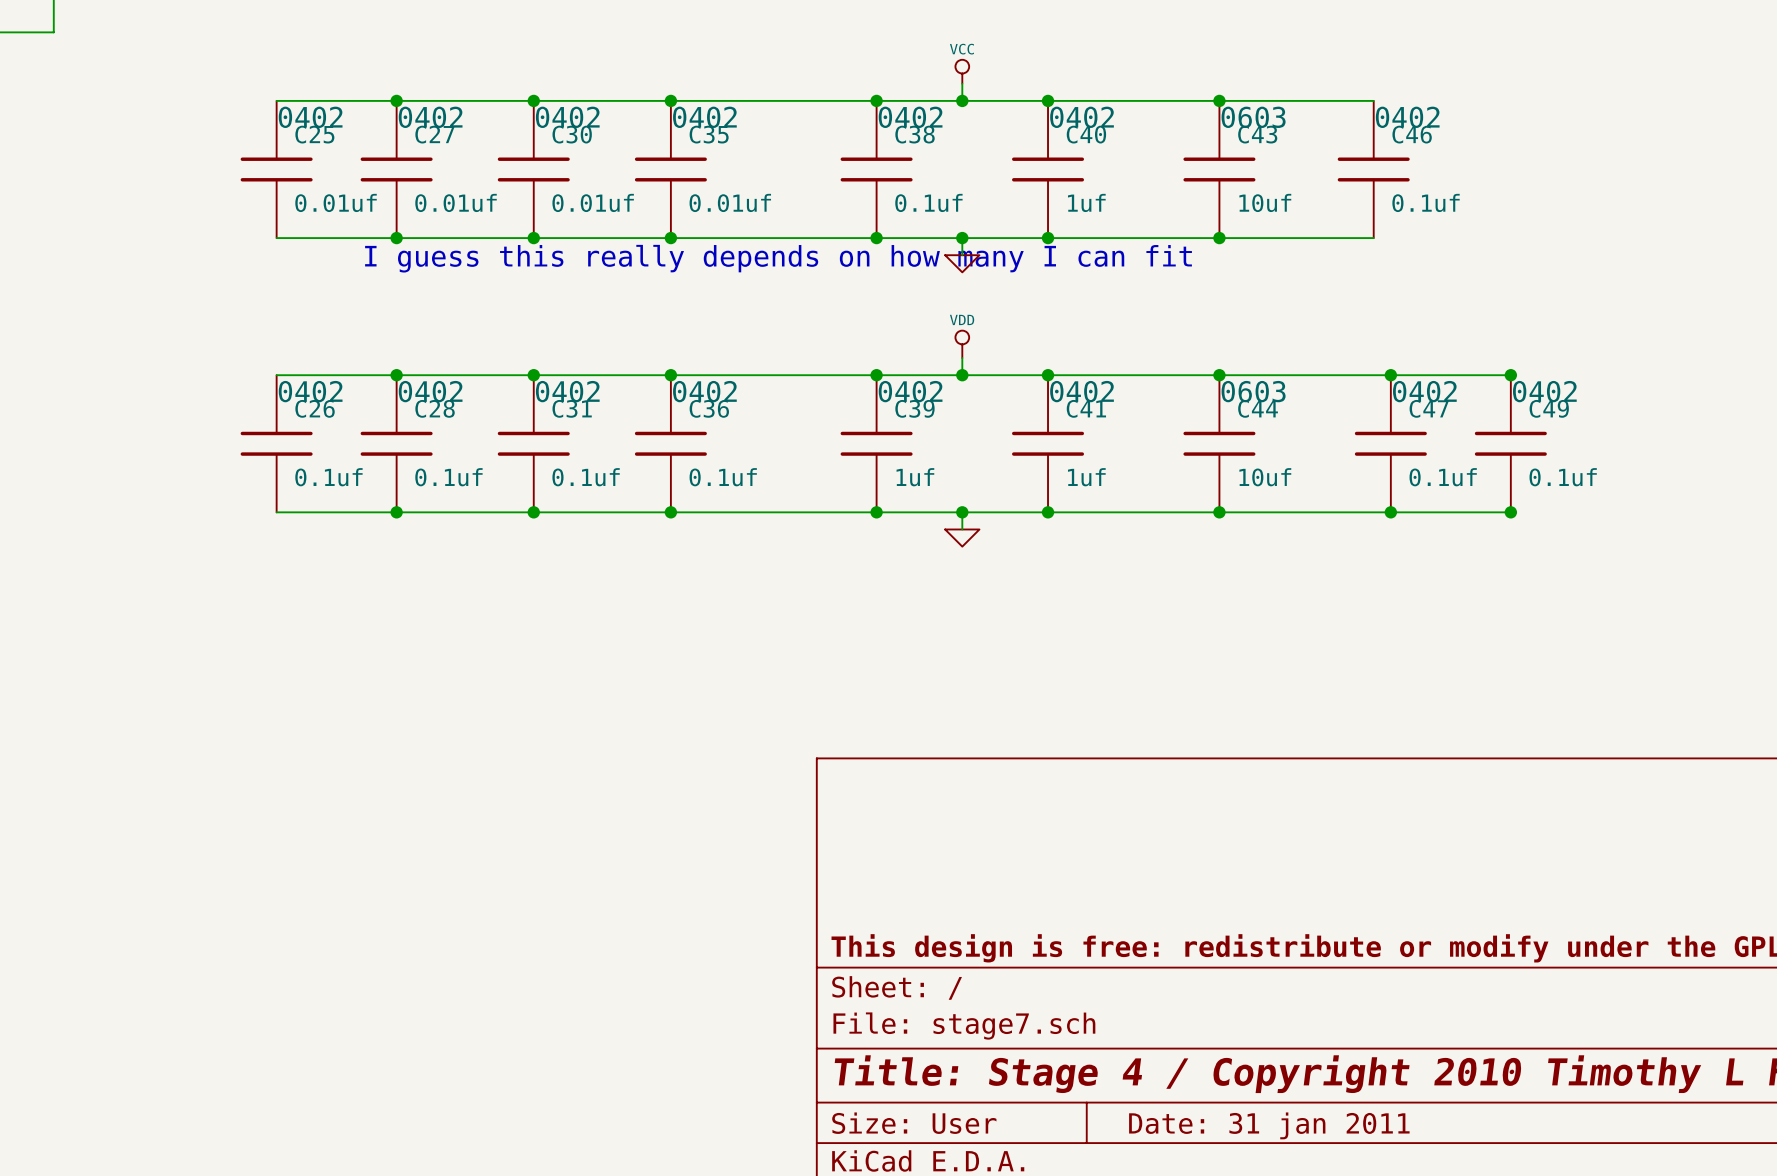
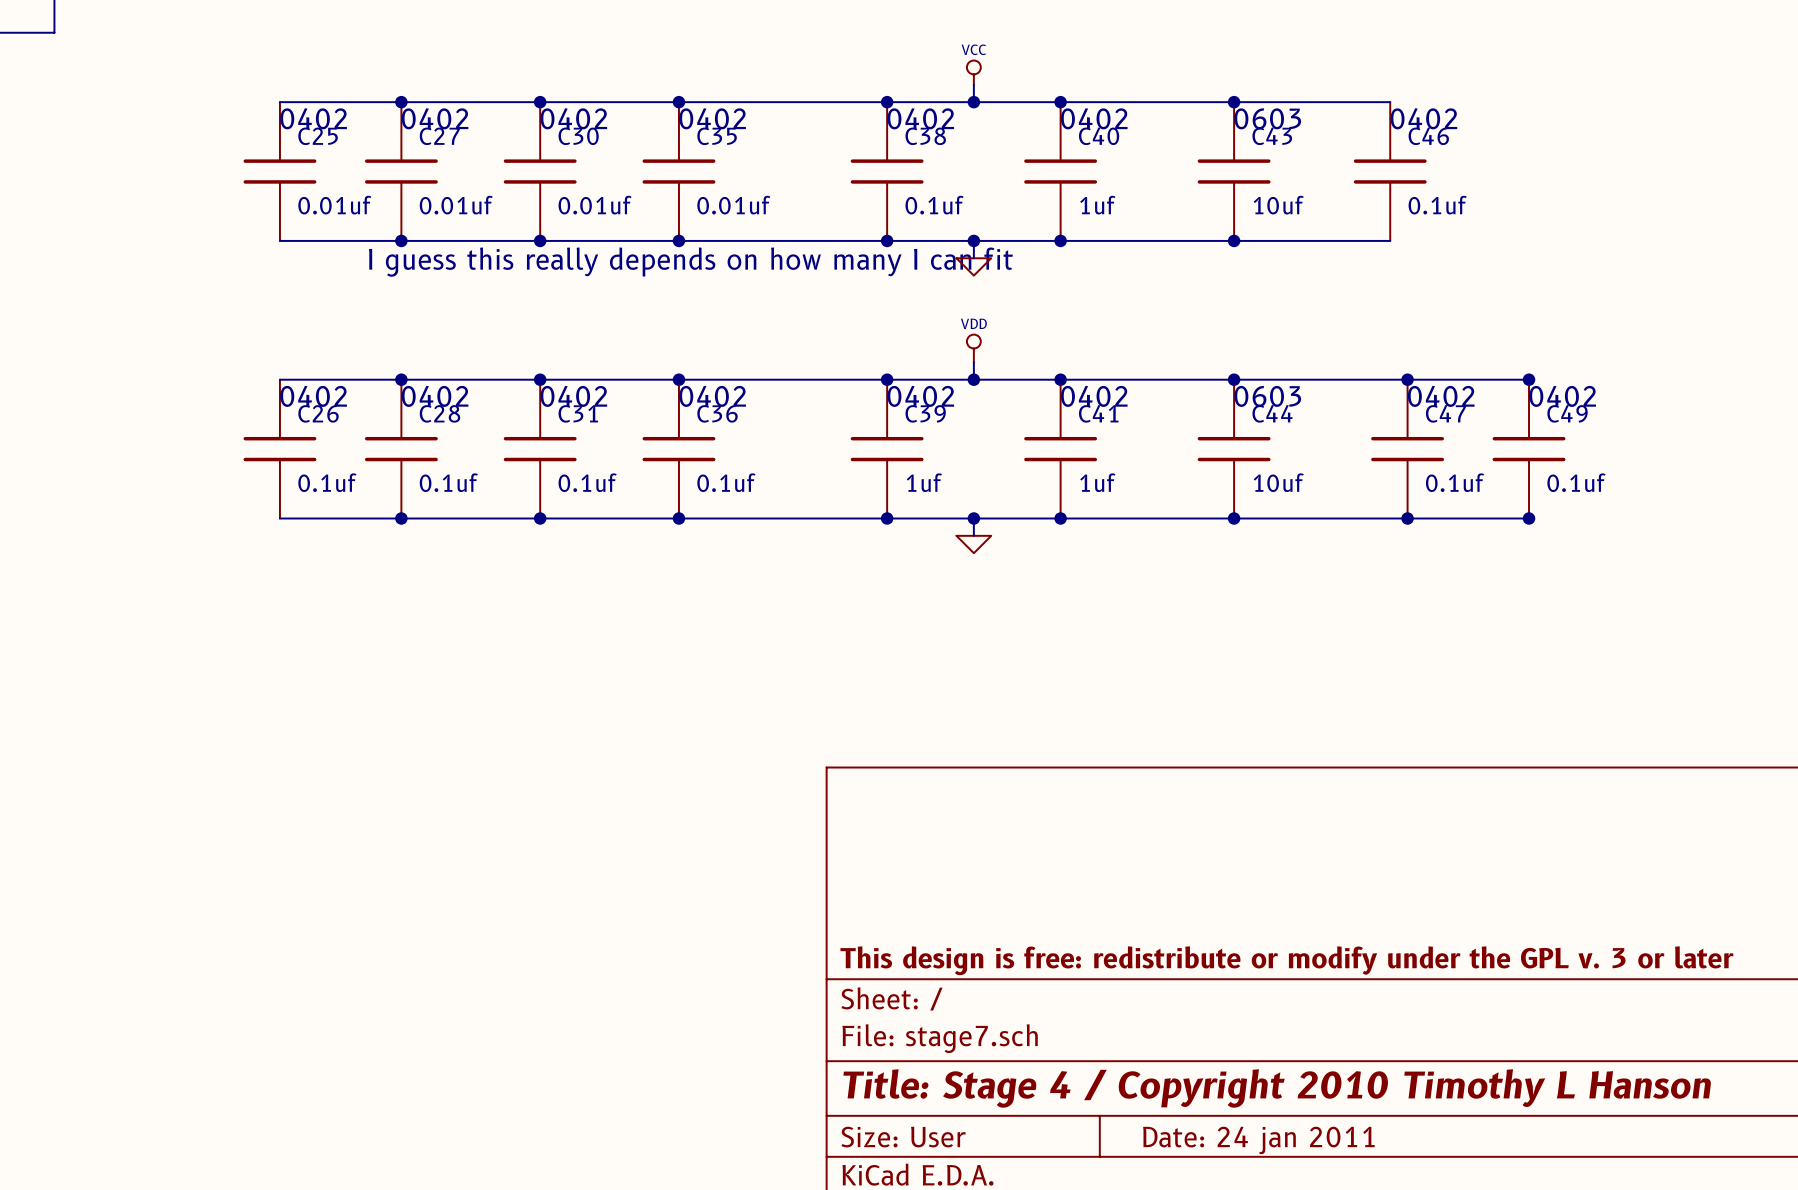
title block: Date: 31 jan 2011 (1269, 1125) -> Date: 24 jan 2011 (1258, 1140)

